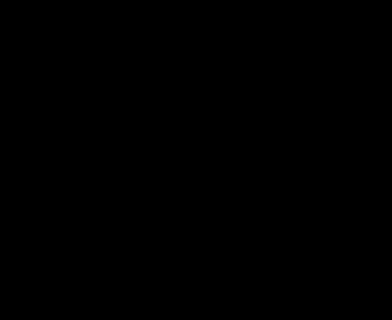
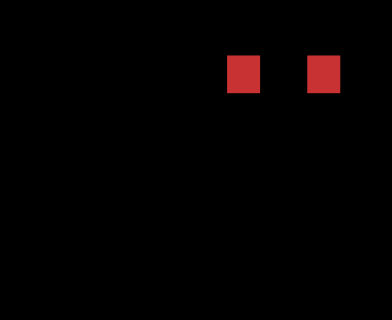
part: none -> (283, 74)

